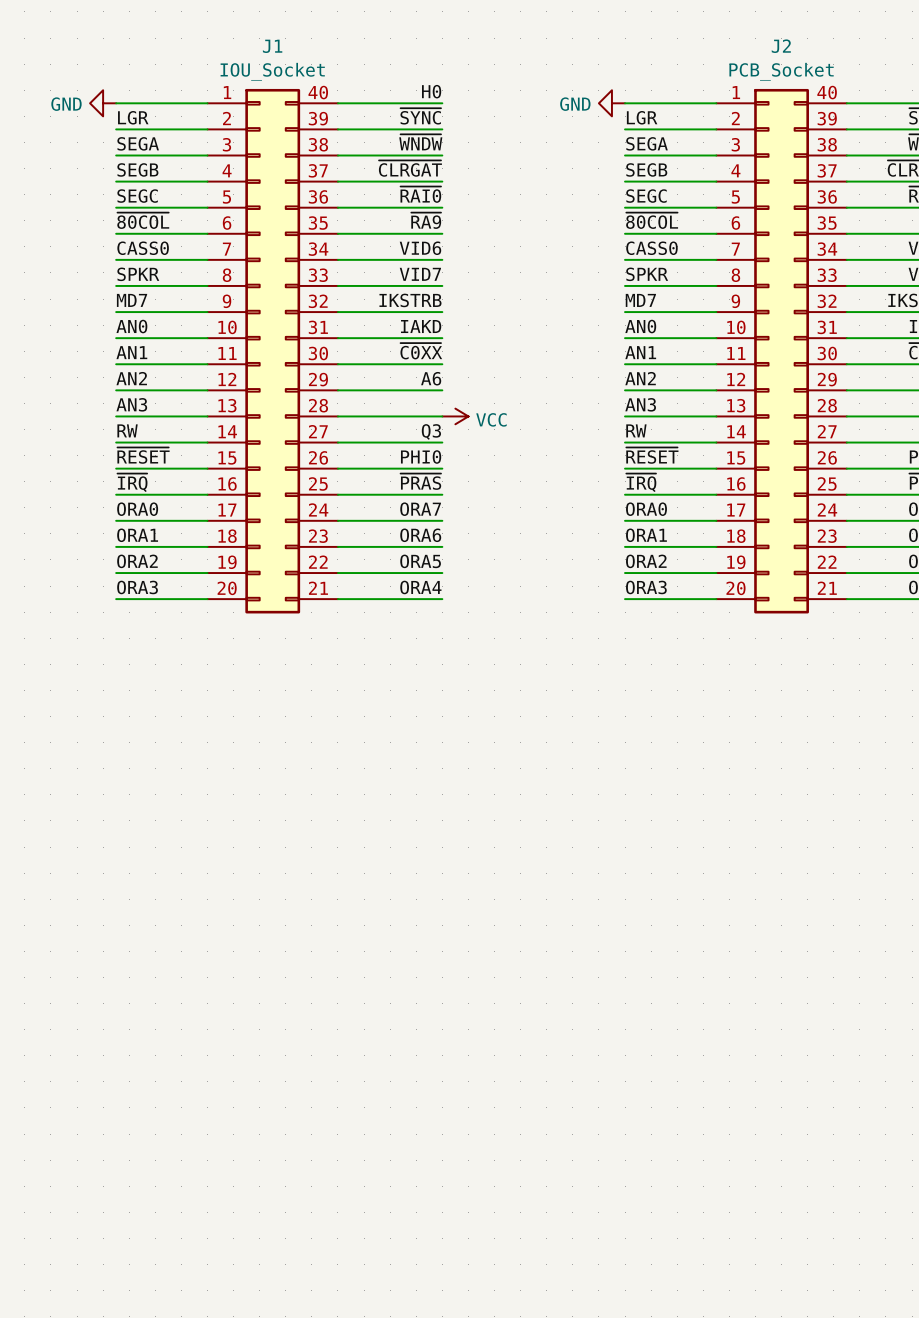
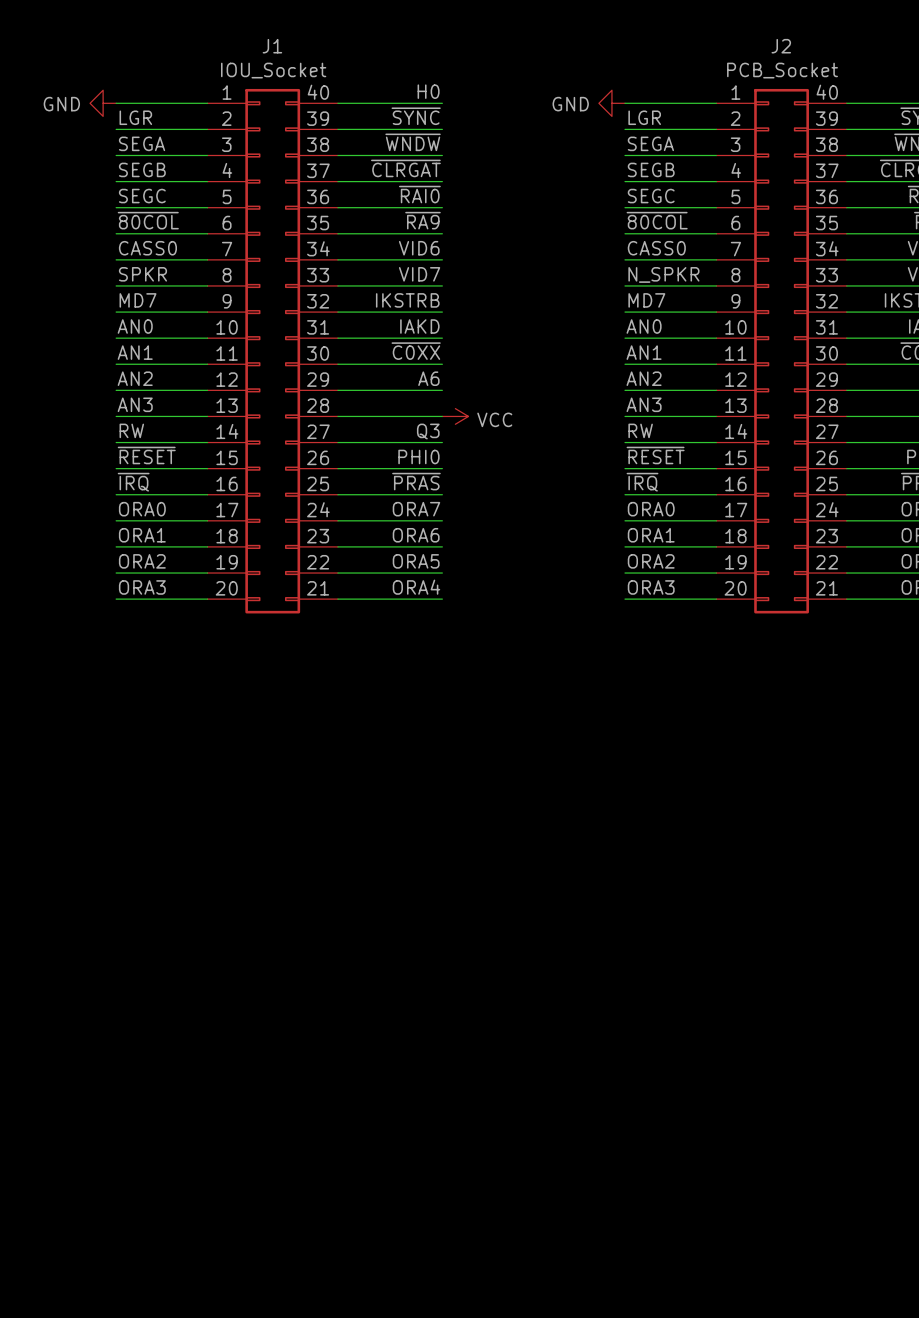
label: SPKR (647, 274) -> N_SPKR (663, 274)

